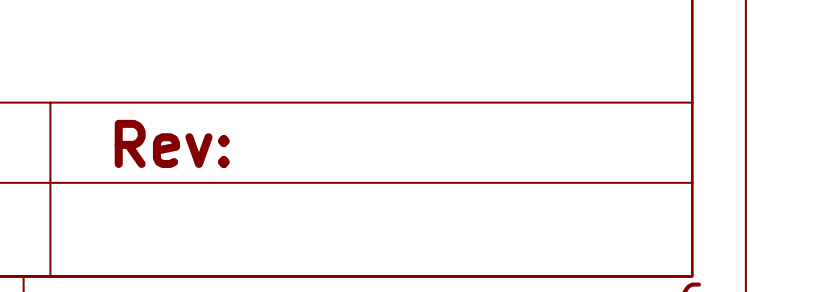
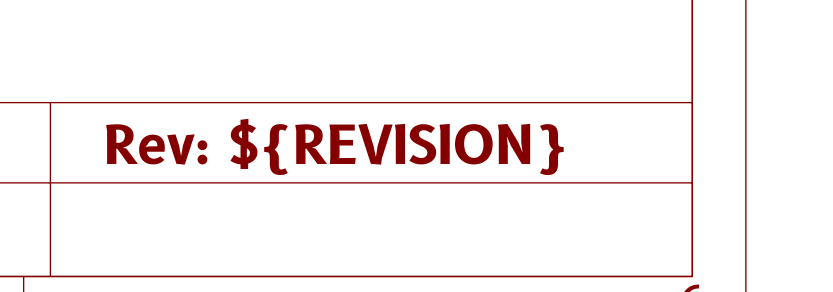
title block: Rev: (172, 143) -> Rev: ${REVISION} (334, 146)

